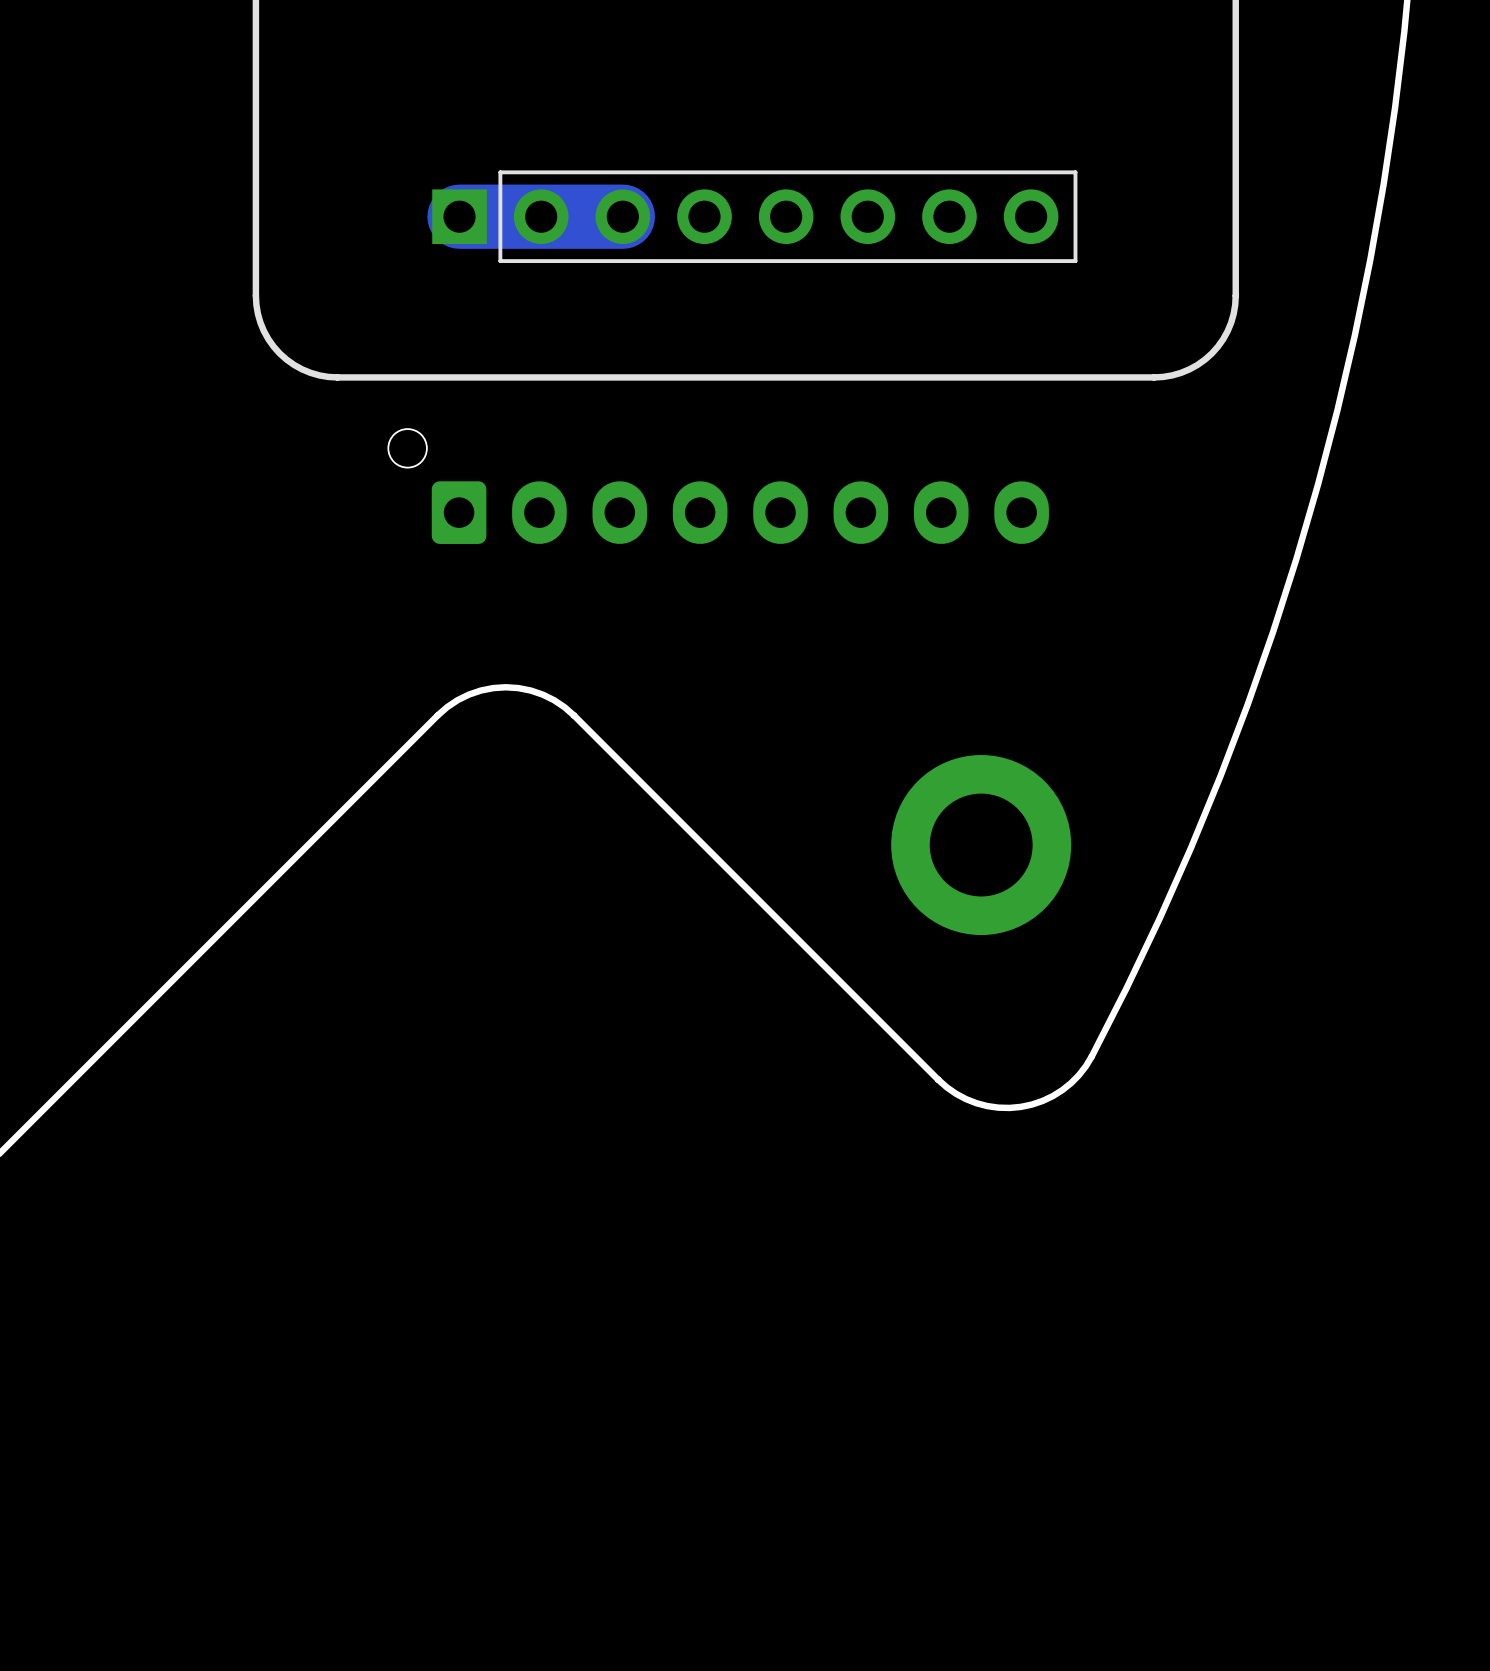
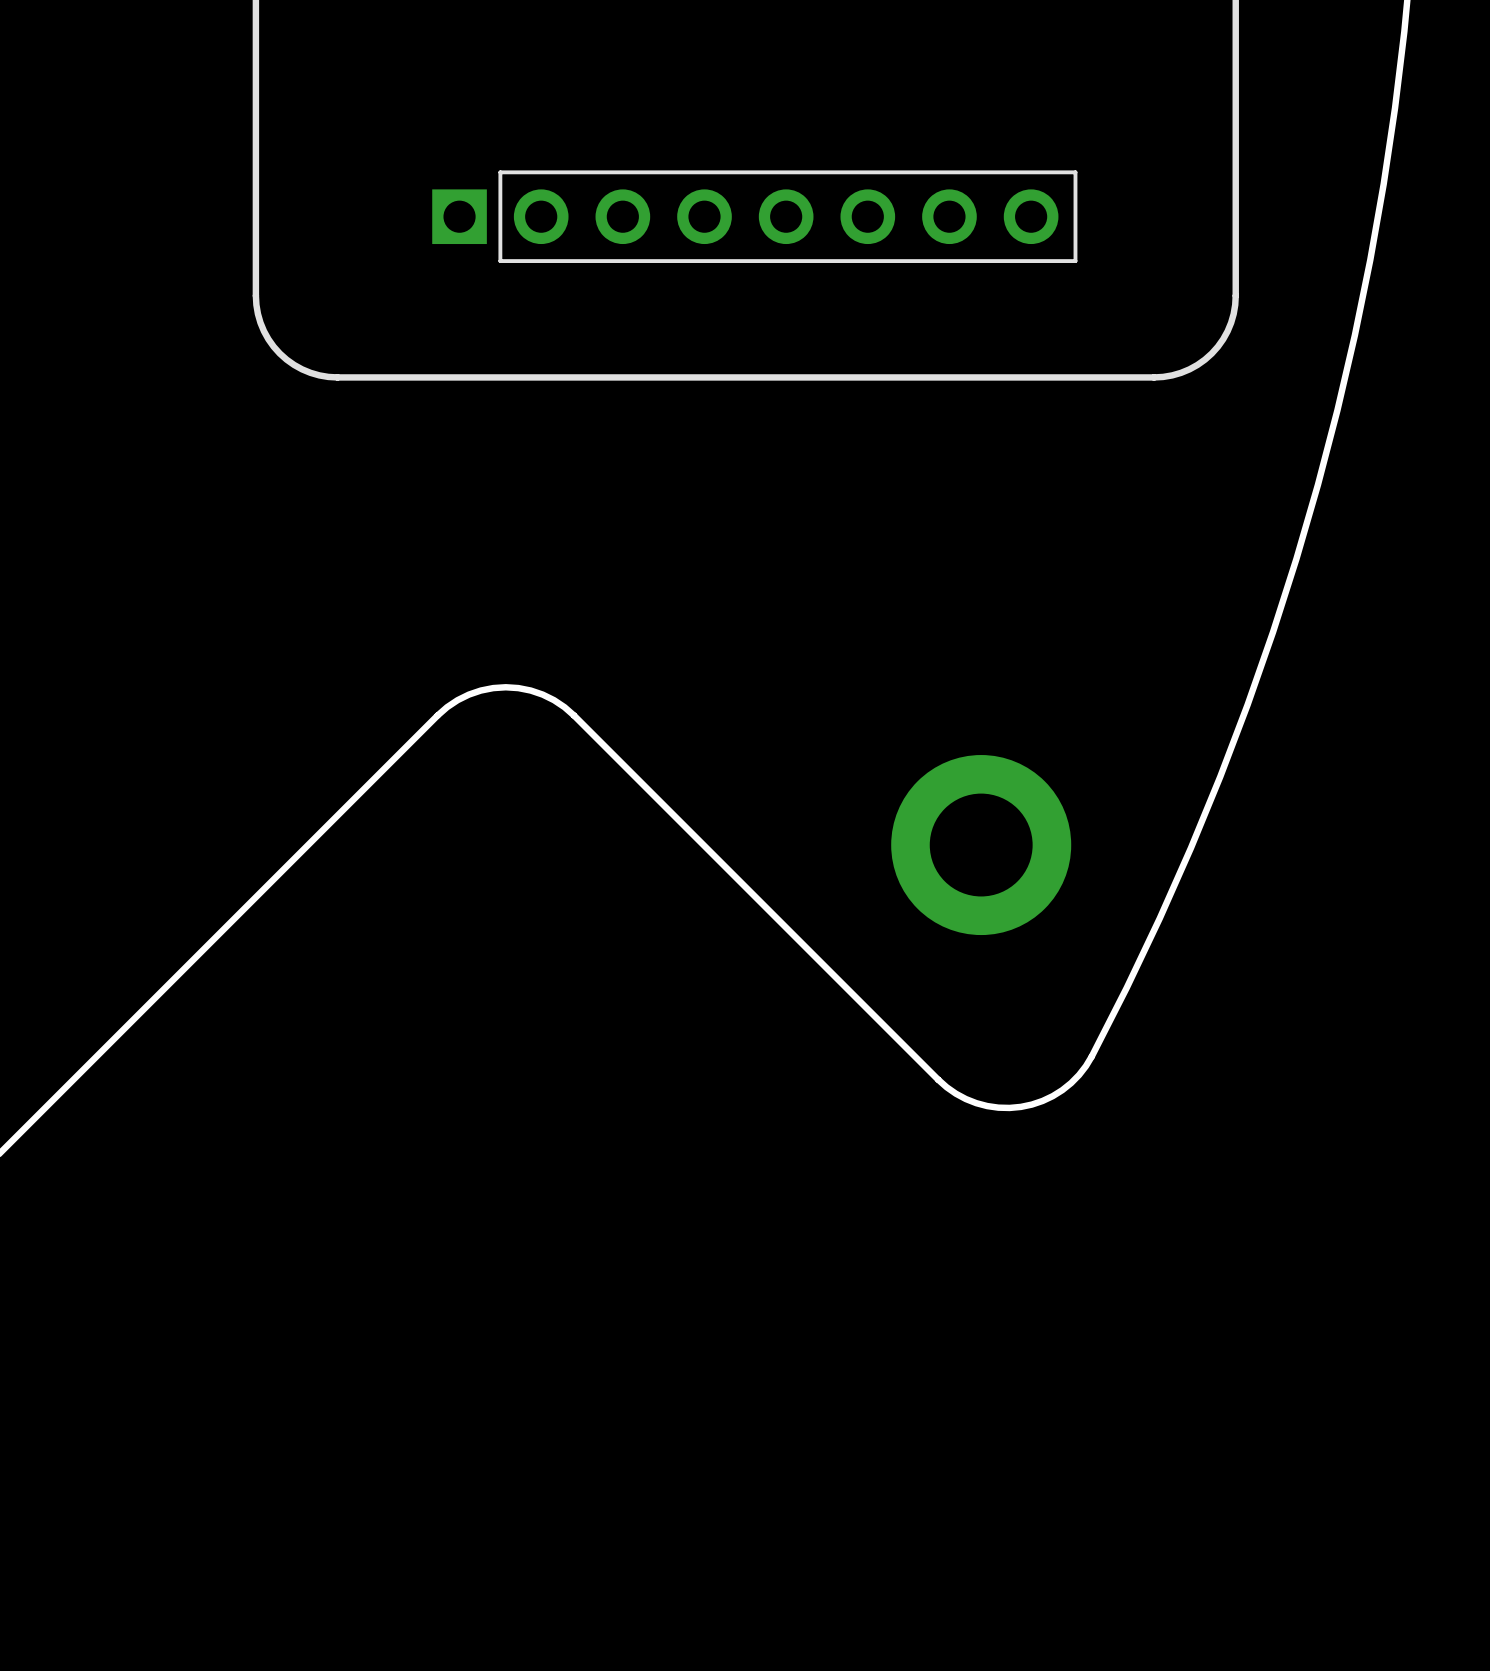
track: (622, 216) (459, 216) -> none
part: (718, 486) -> none

